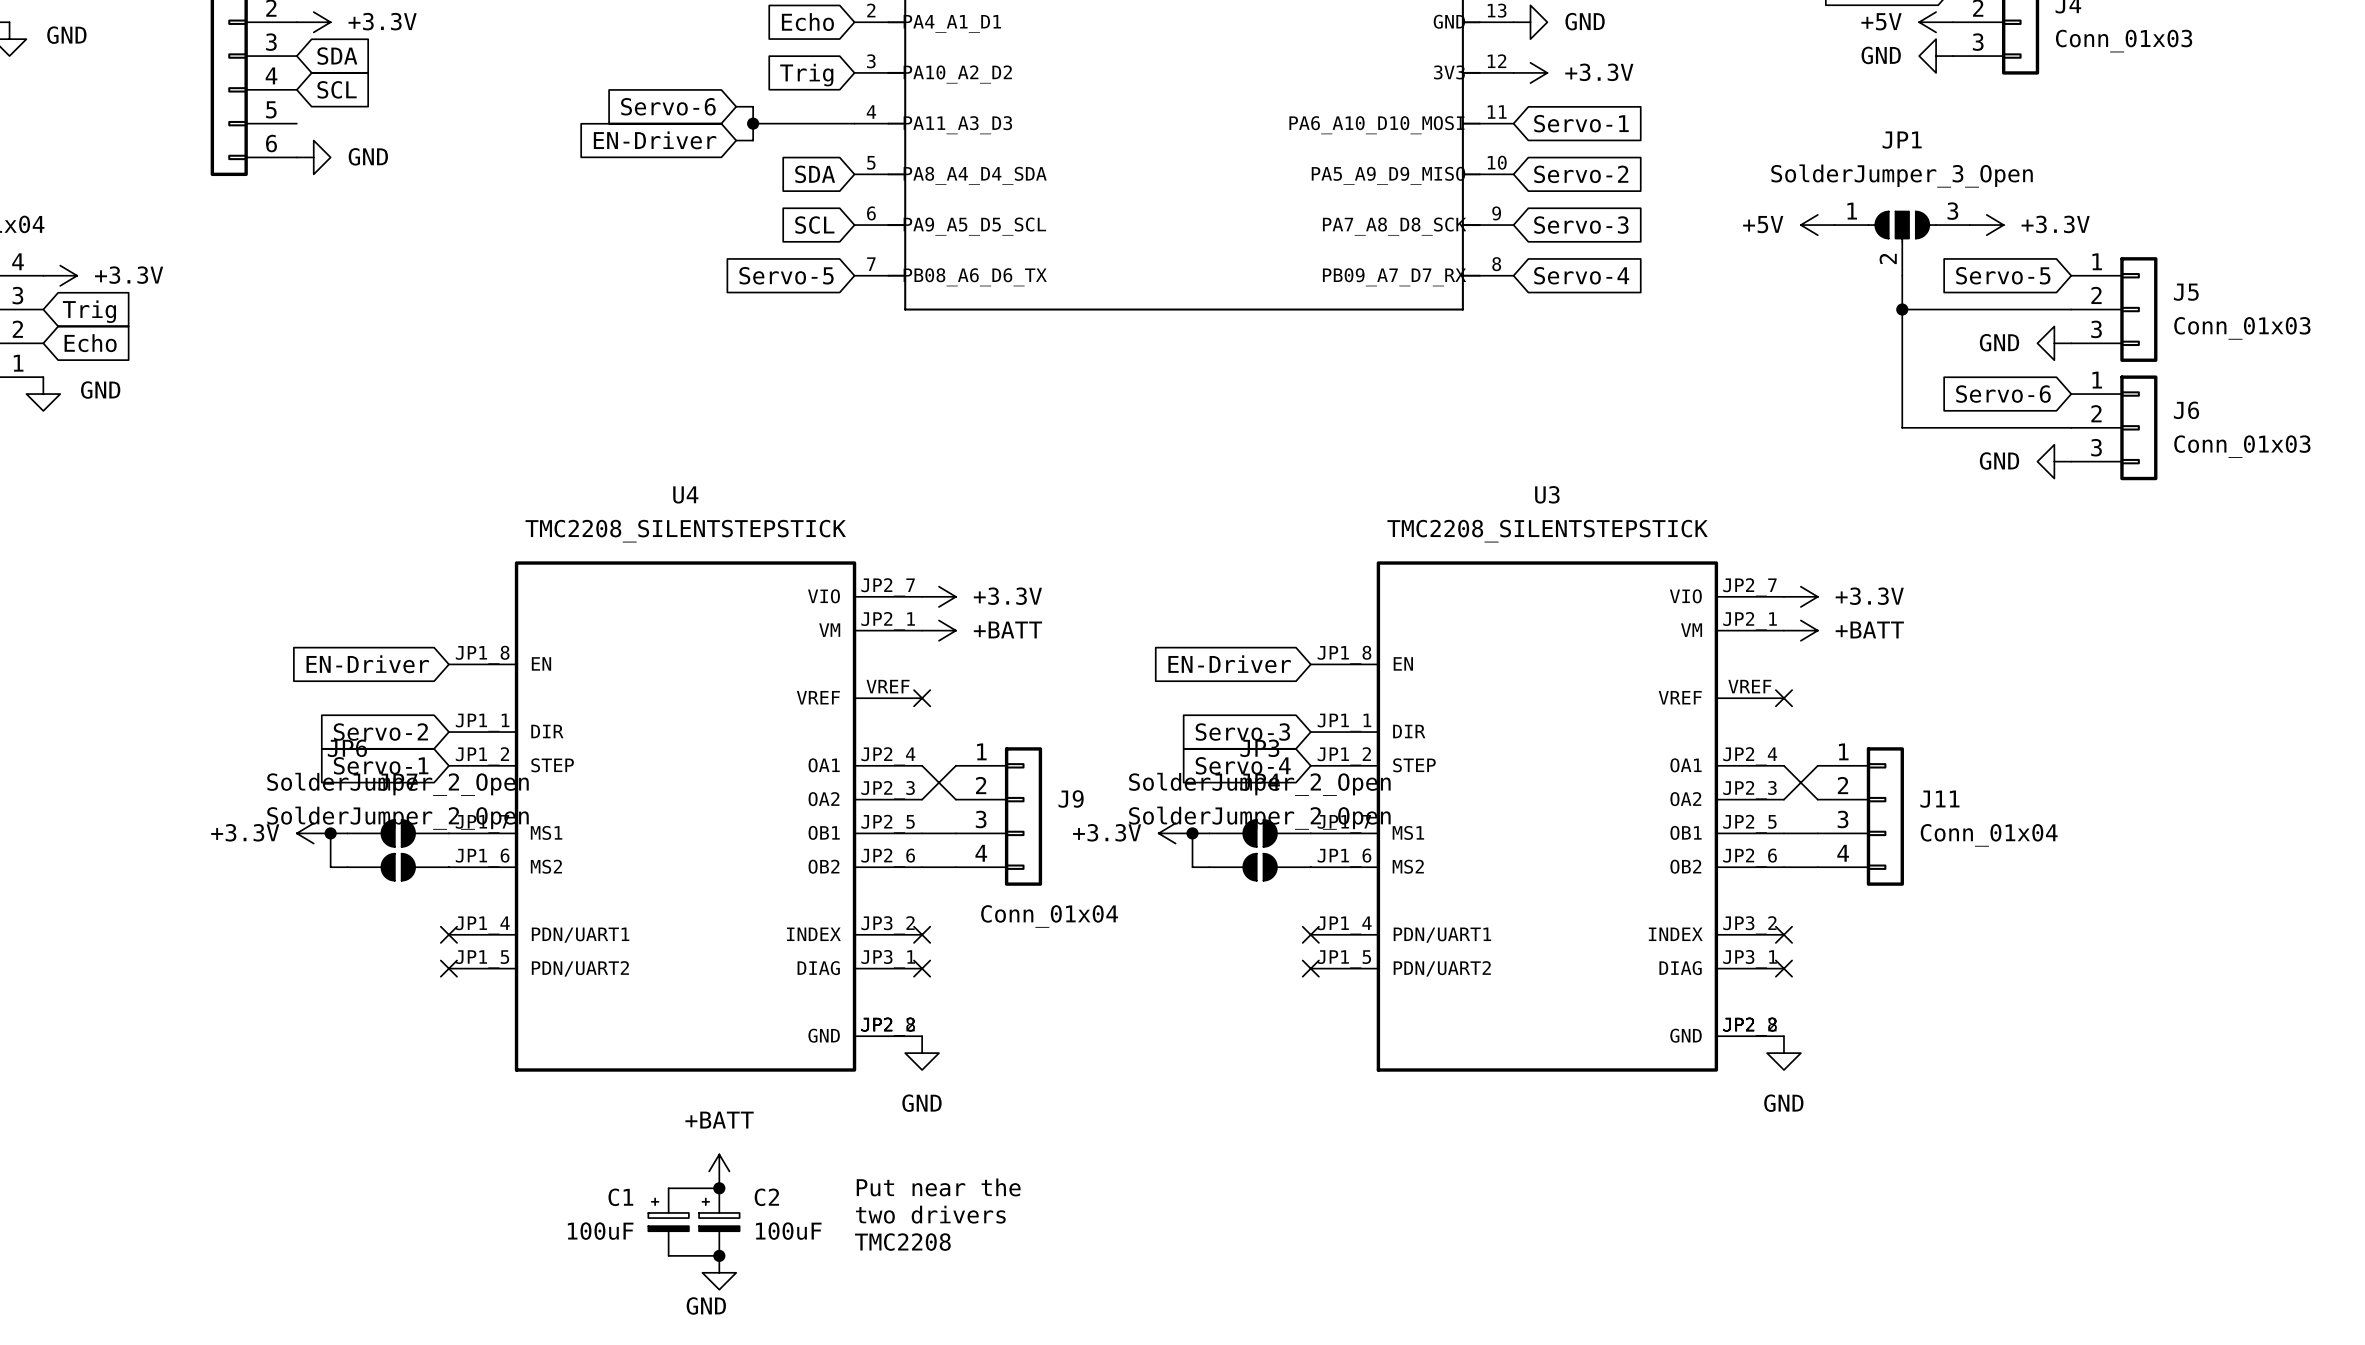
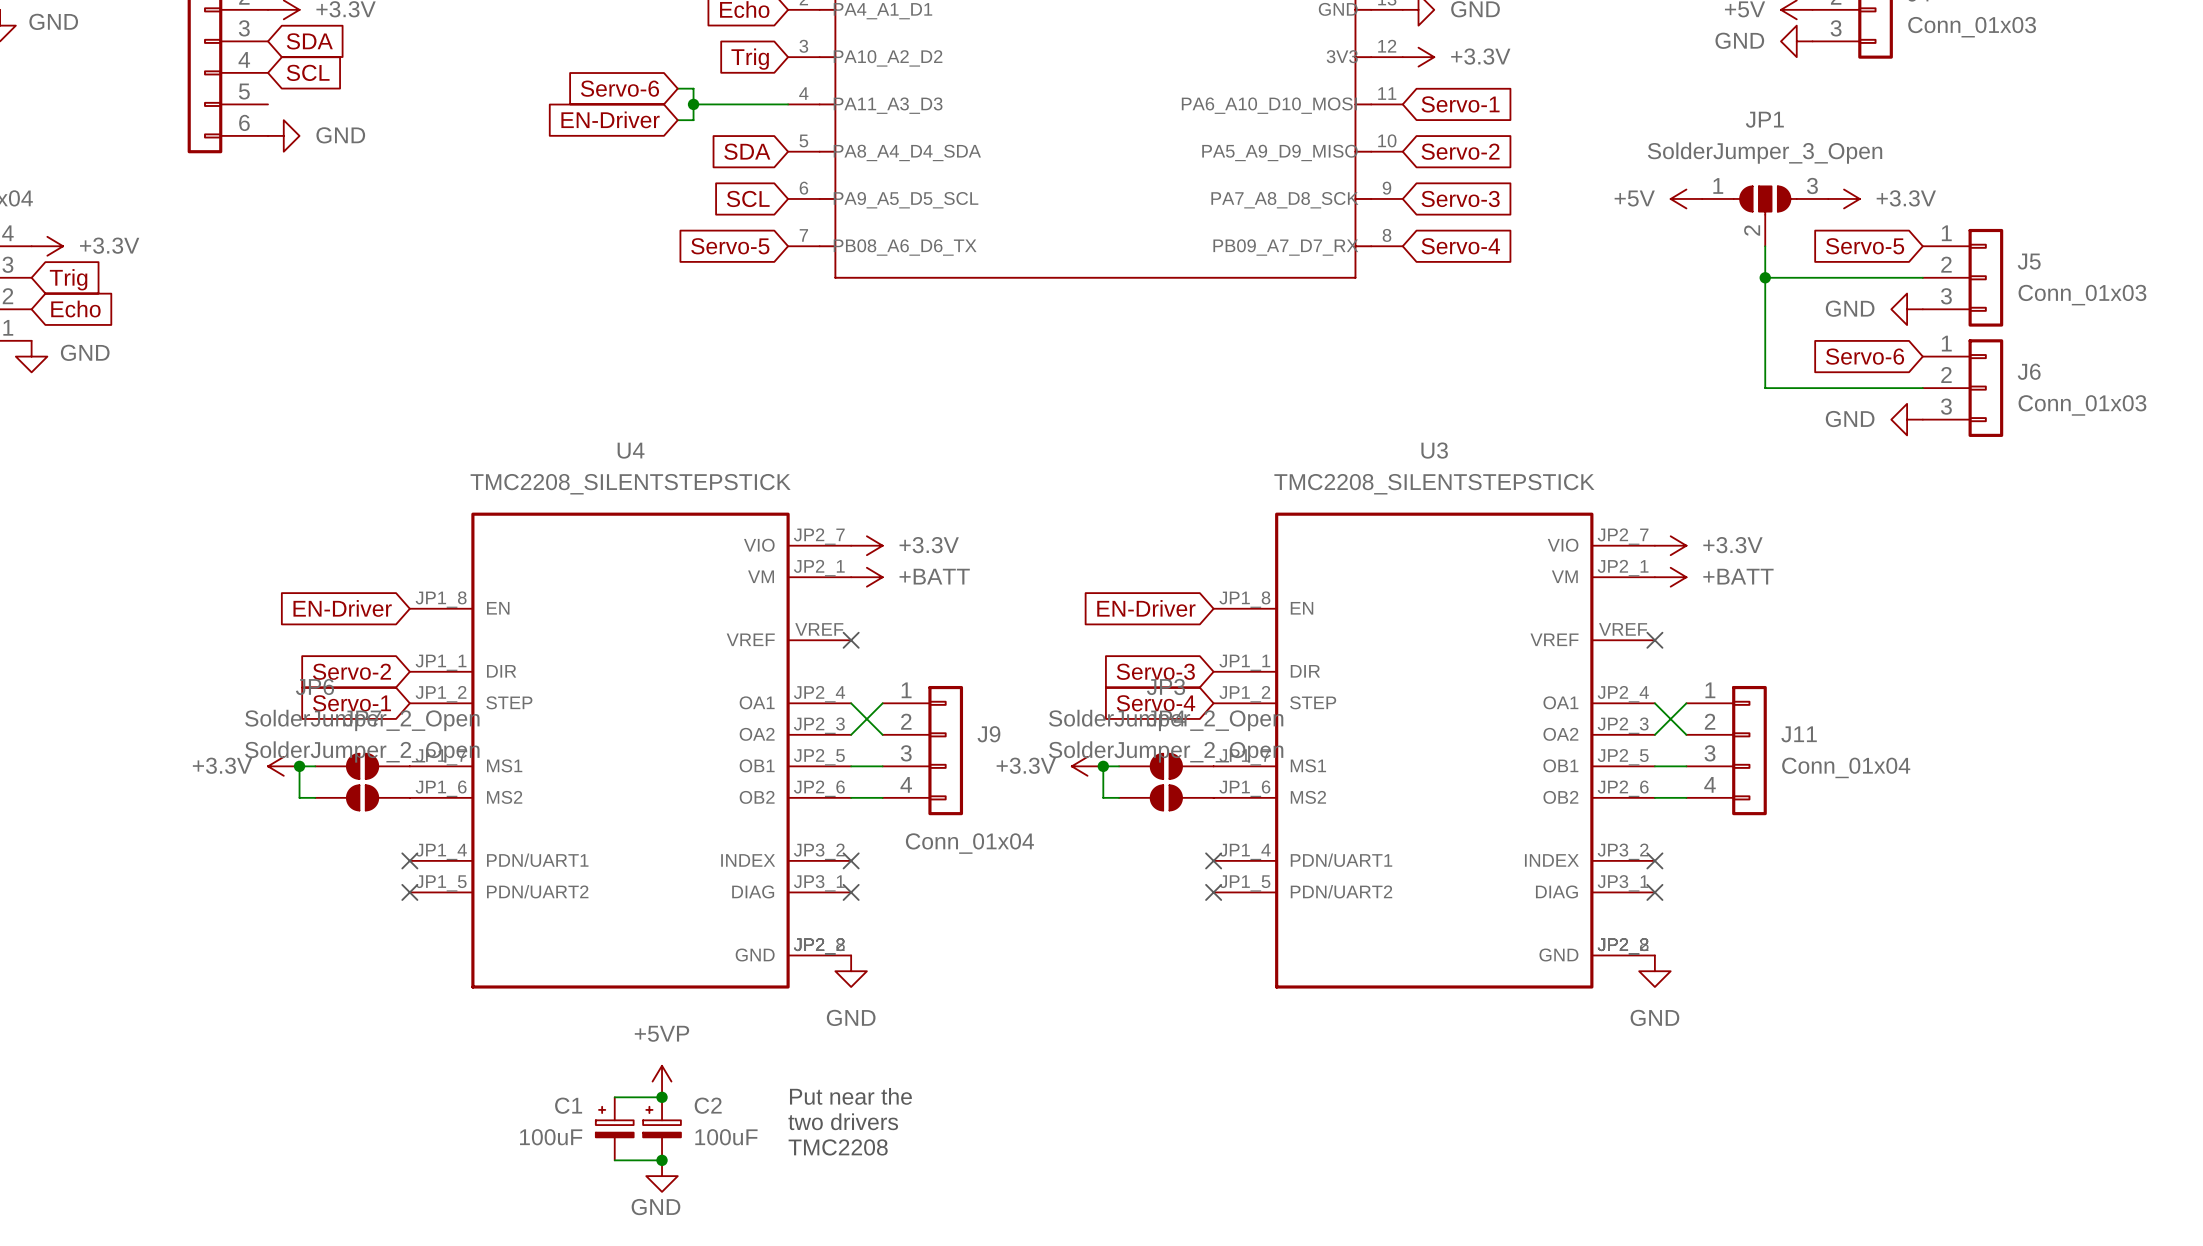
power symbol: +BATT (719, 1171) -> +5VP (662, 1081)

